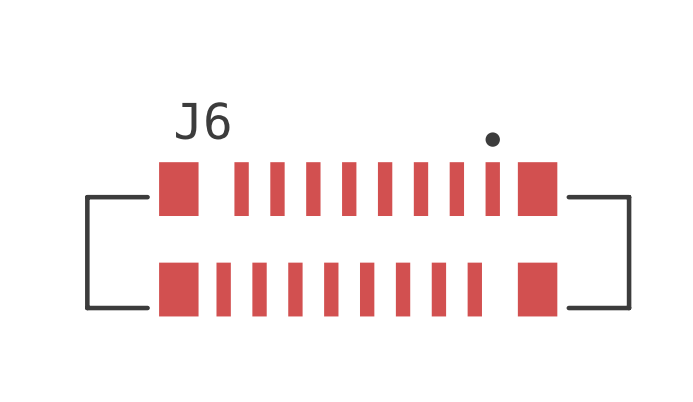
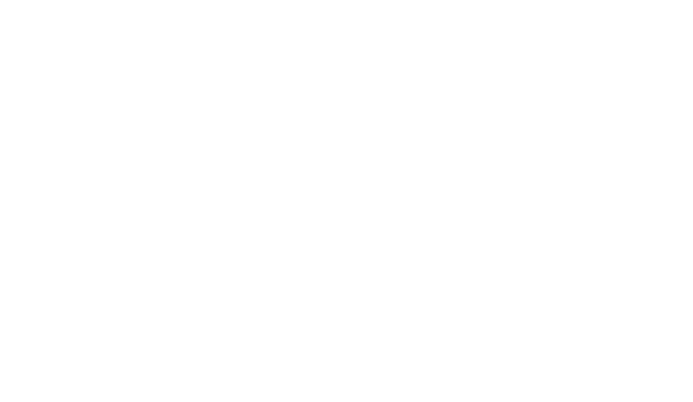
J6: (358, 224) -> none

